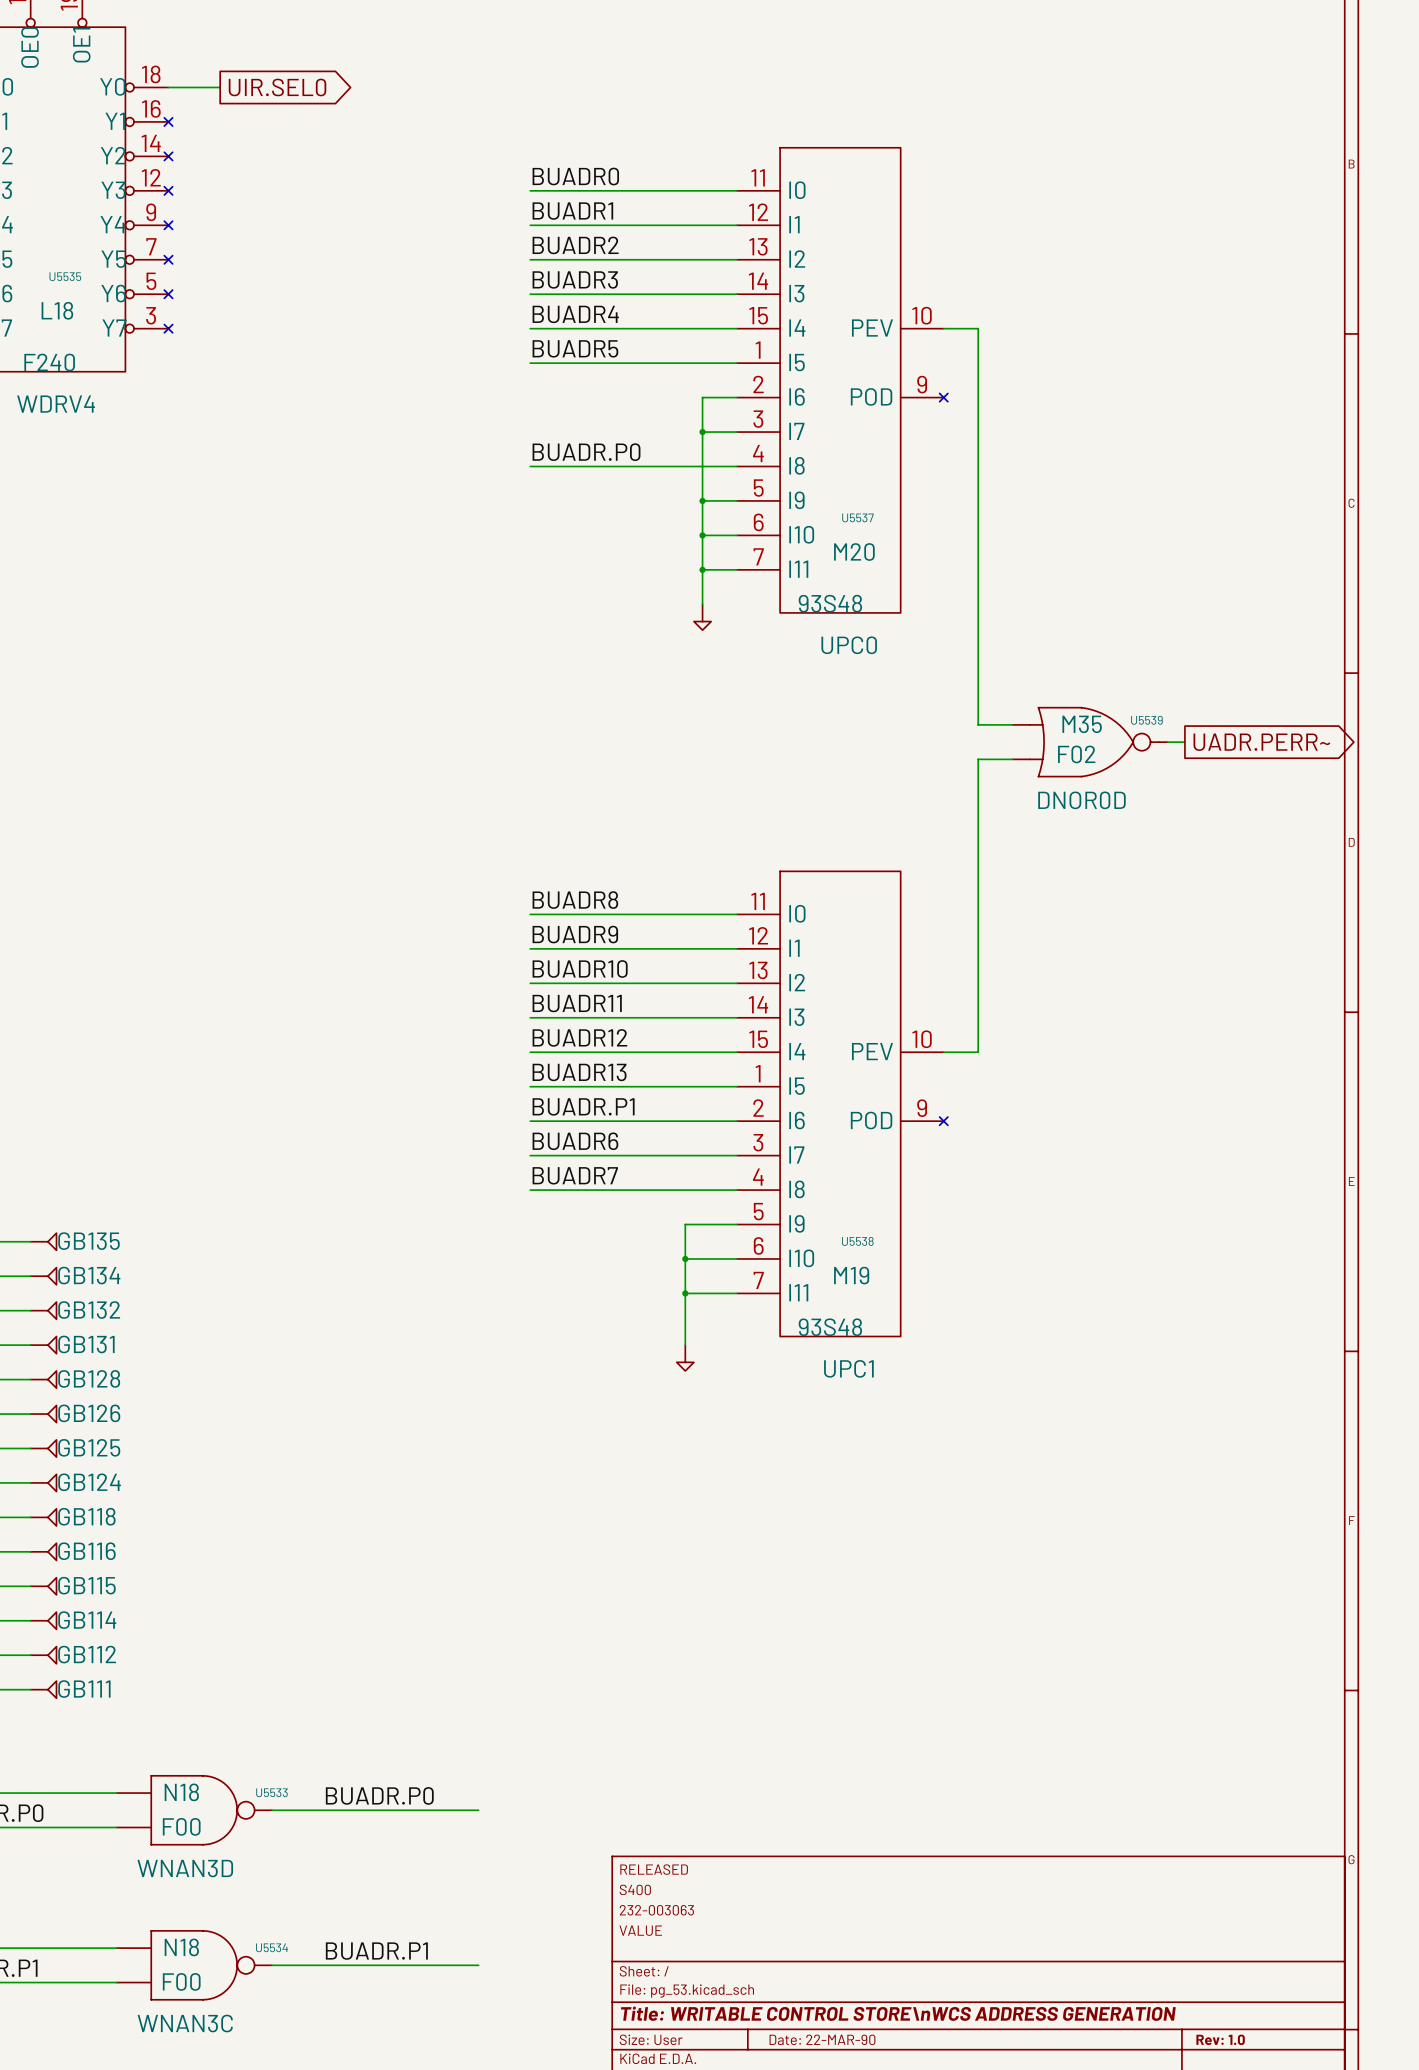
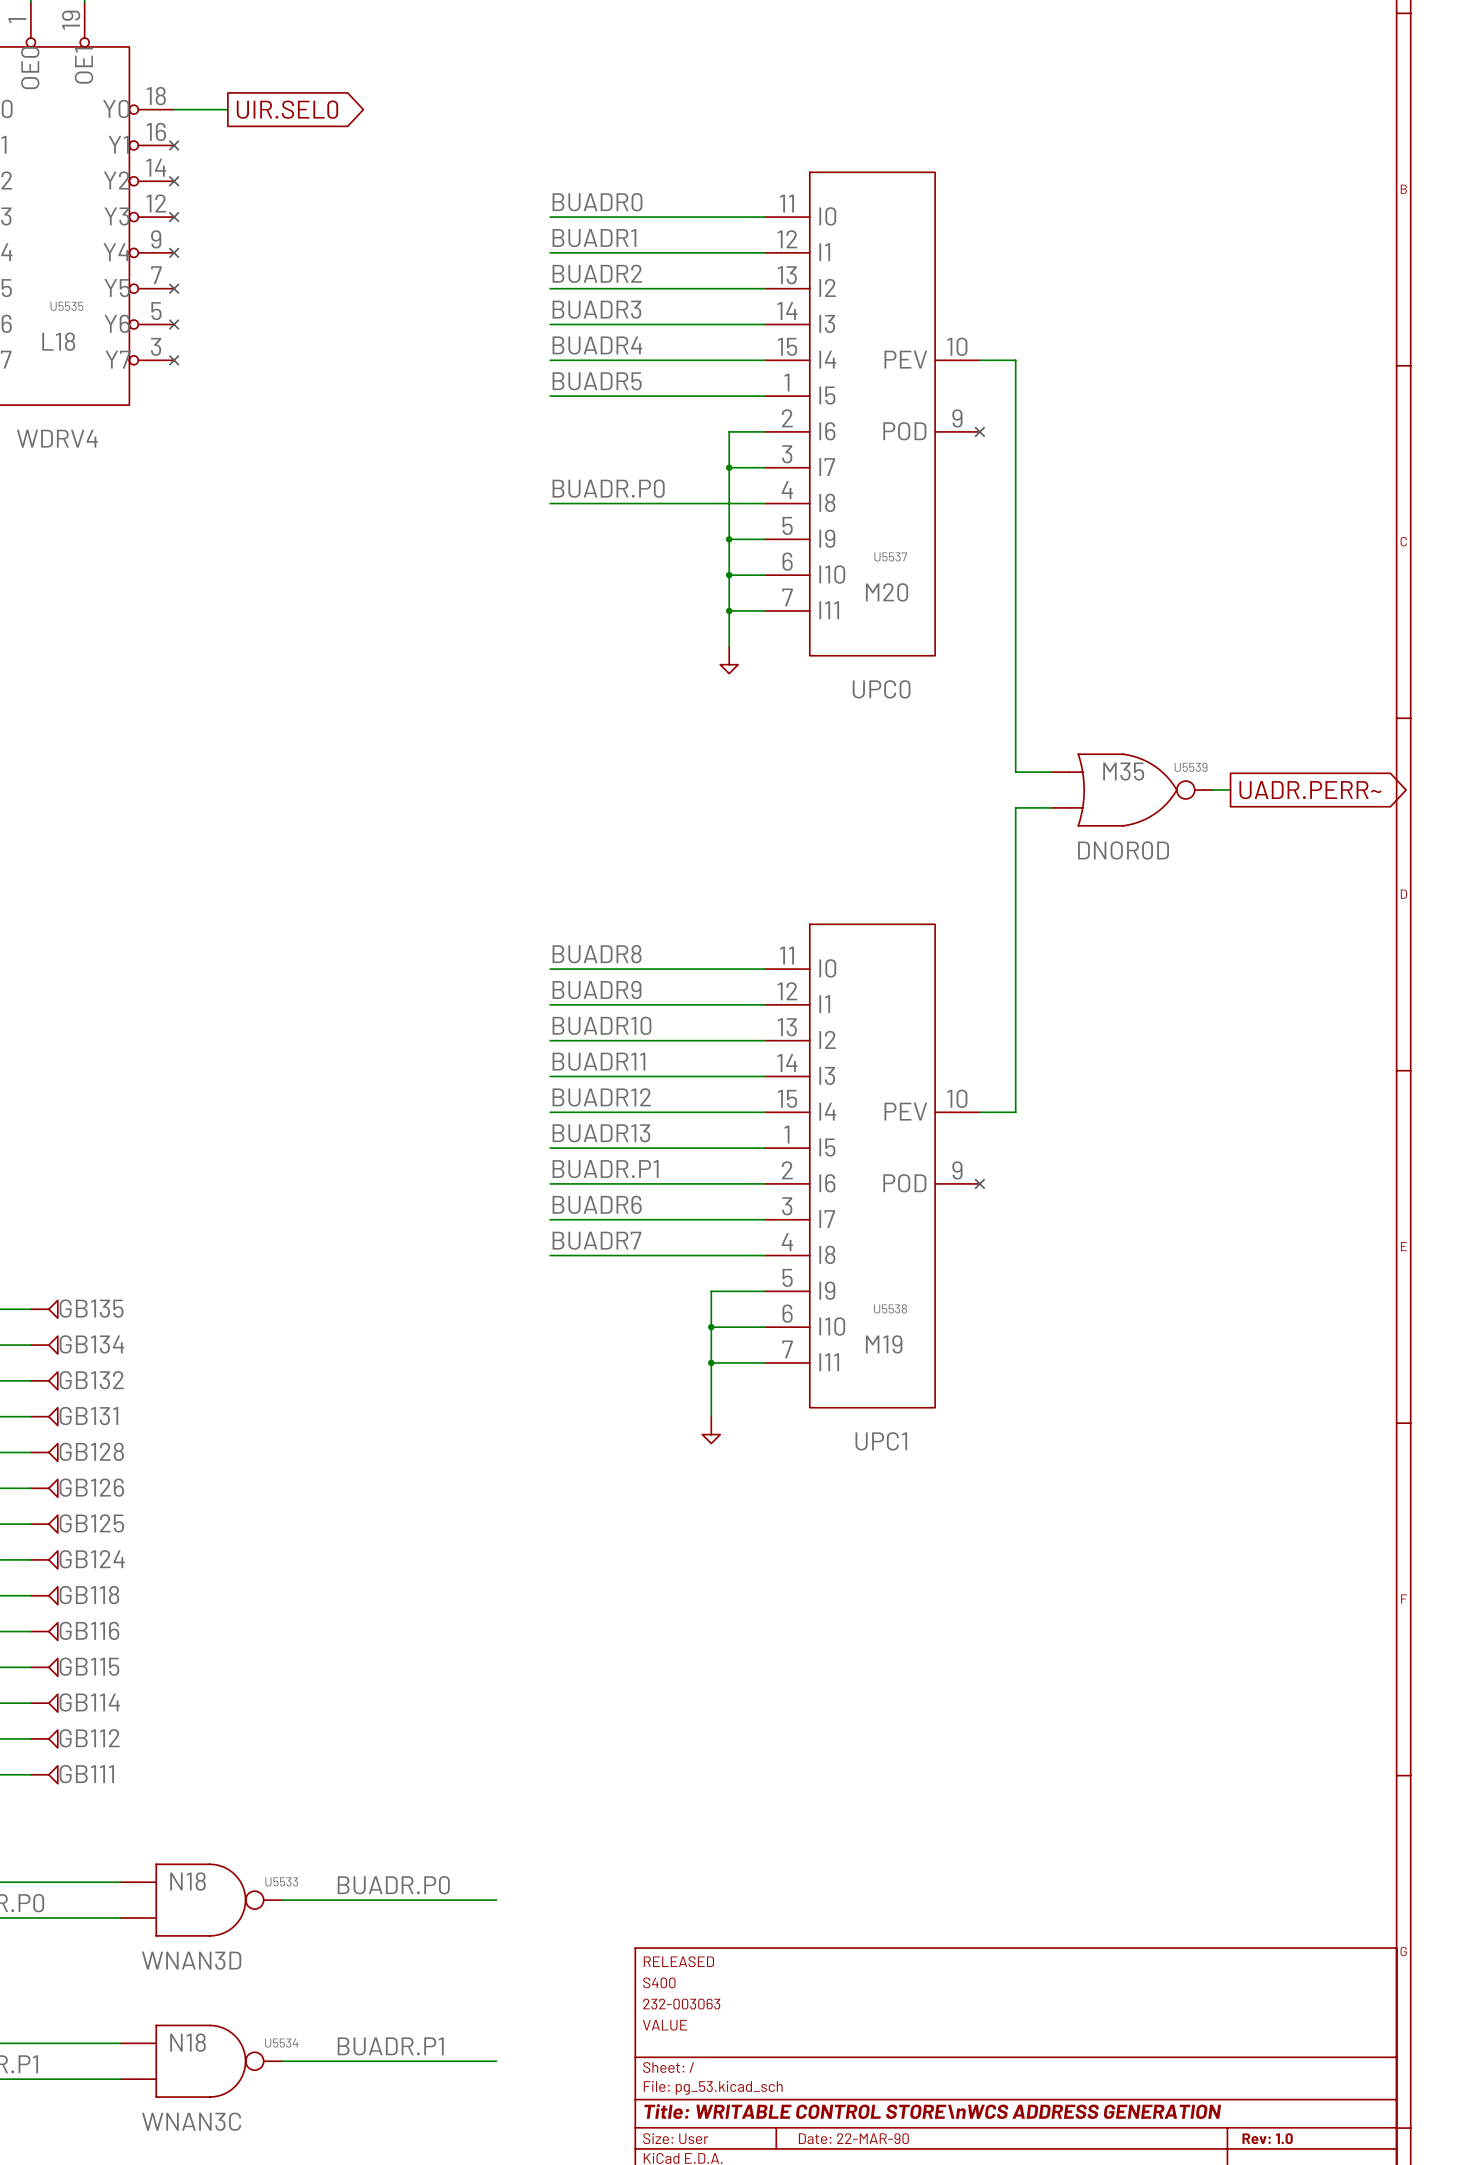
U5535 value: F240 (49, 362) -> none
U5537 value: 93S48 (830, 603) -> none
U5539 value: F02 (1076, 754) -> none
U5538 value: 93S48 (830, 1327) -> none
U5533 value: F00 (181, 1826) -> none
U5534 value: F00 (181, 1981) -> none

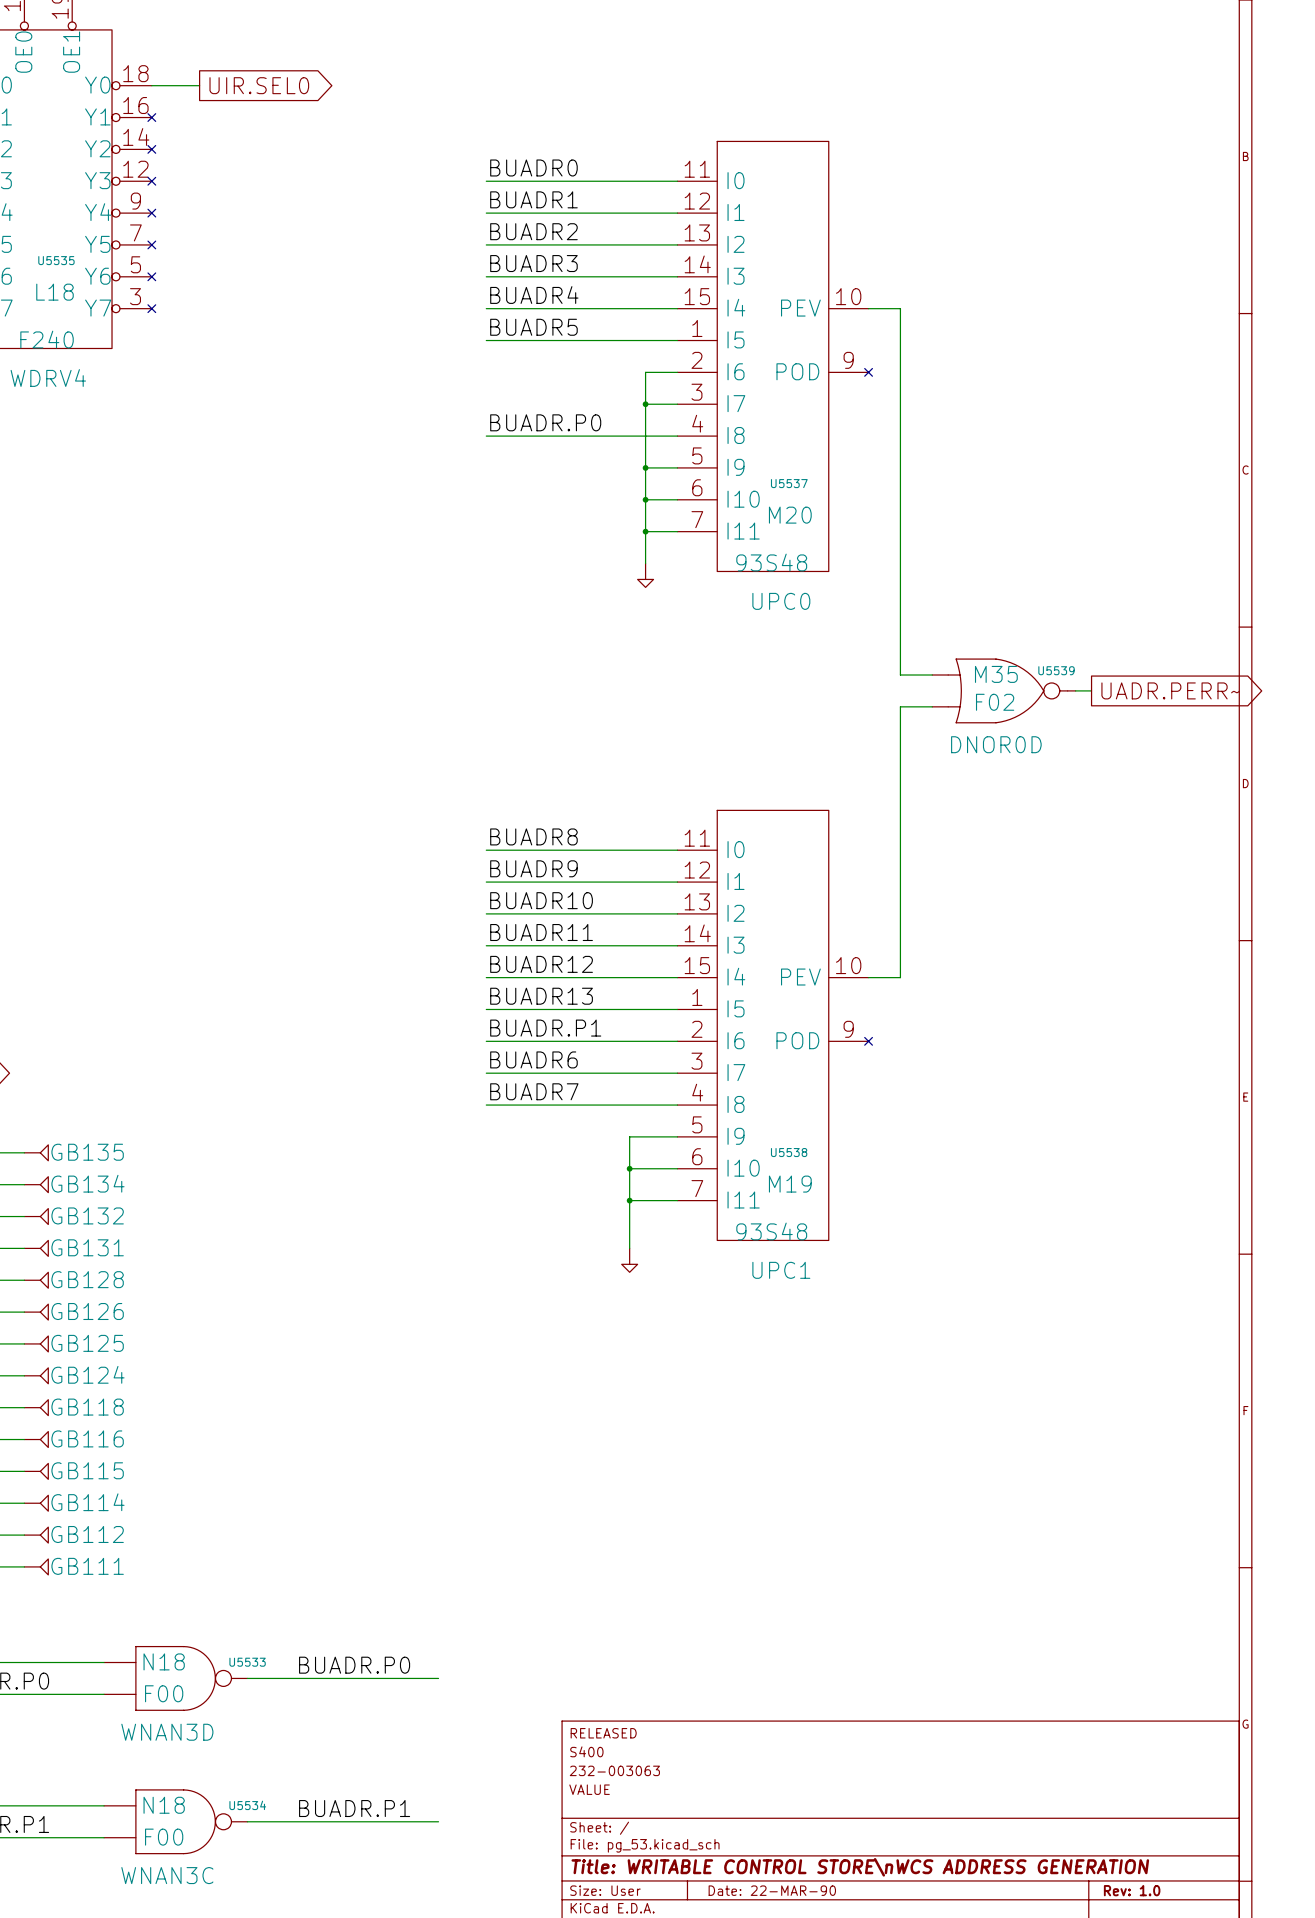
U5535 value: none -> F240 (47, 339)
U5537 value: none -> 93S48 (771, 562)
U5539 value: none -> F02 (995, 702)
U5538 value: none -> 93S48 (771, 1231)
U5533 value: none -> F00 (164, 1693)
U5534 value: none -> F00 (164, 1837)

